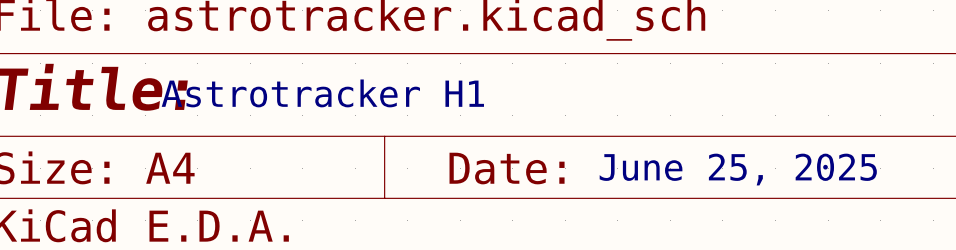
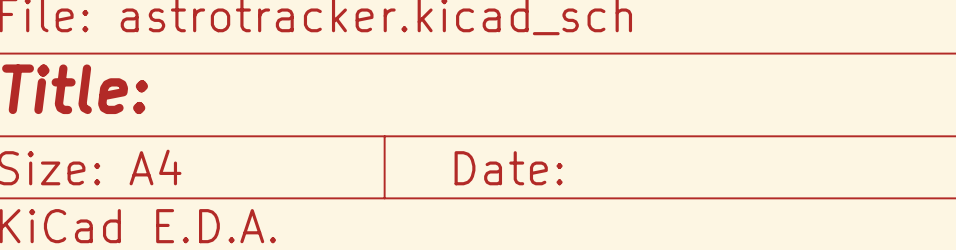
text: Astrotracker H1 (322, 93) -> none
text: June 25, 2025 (738, 169) -> none

